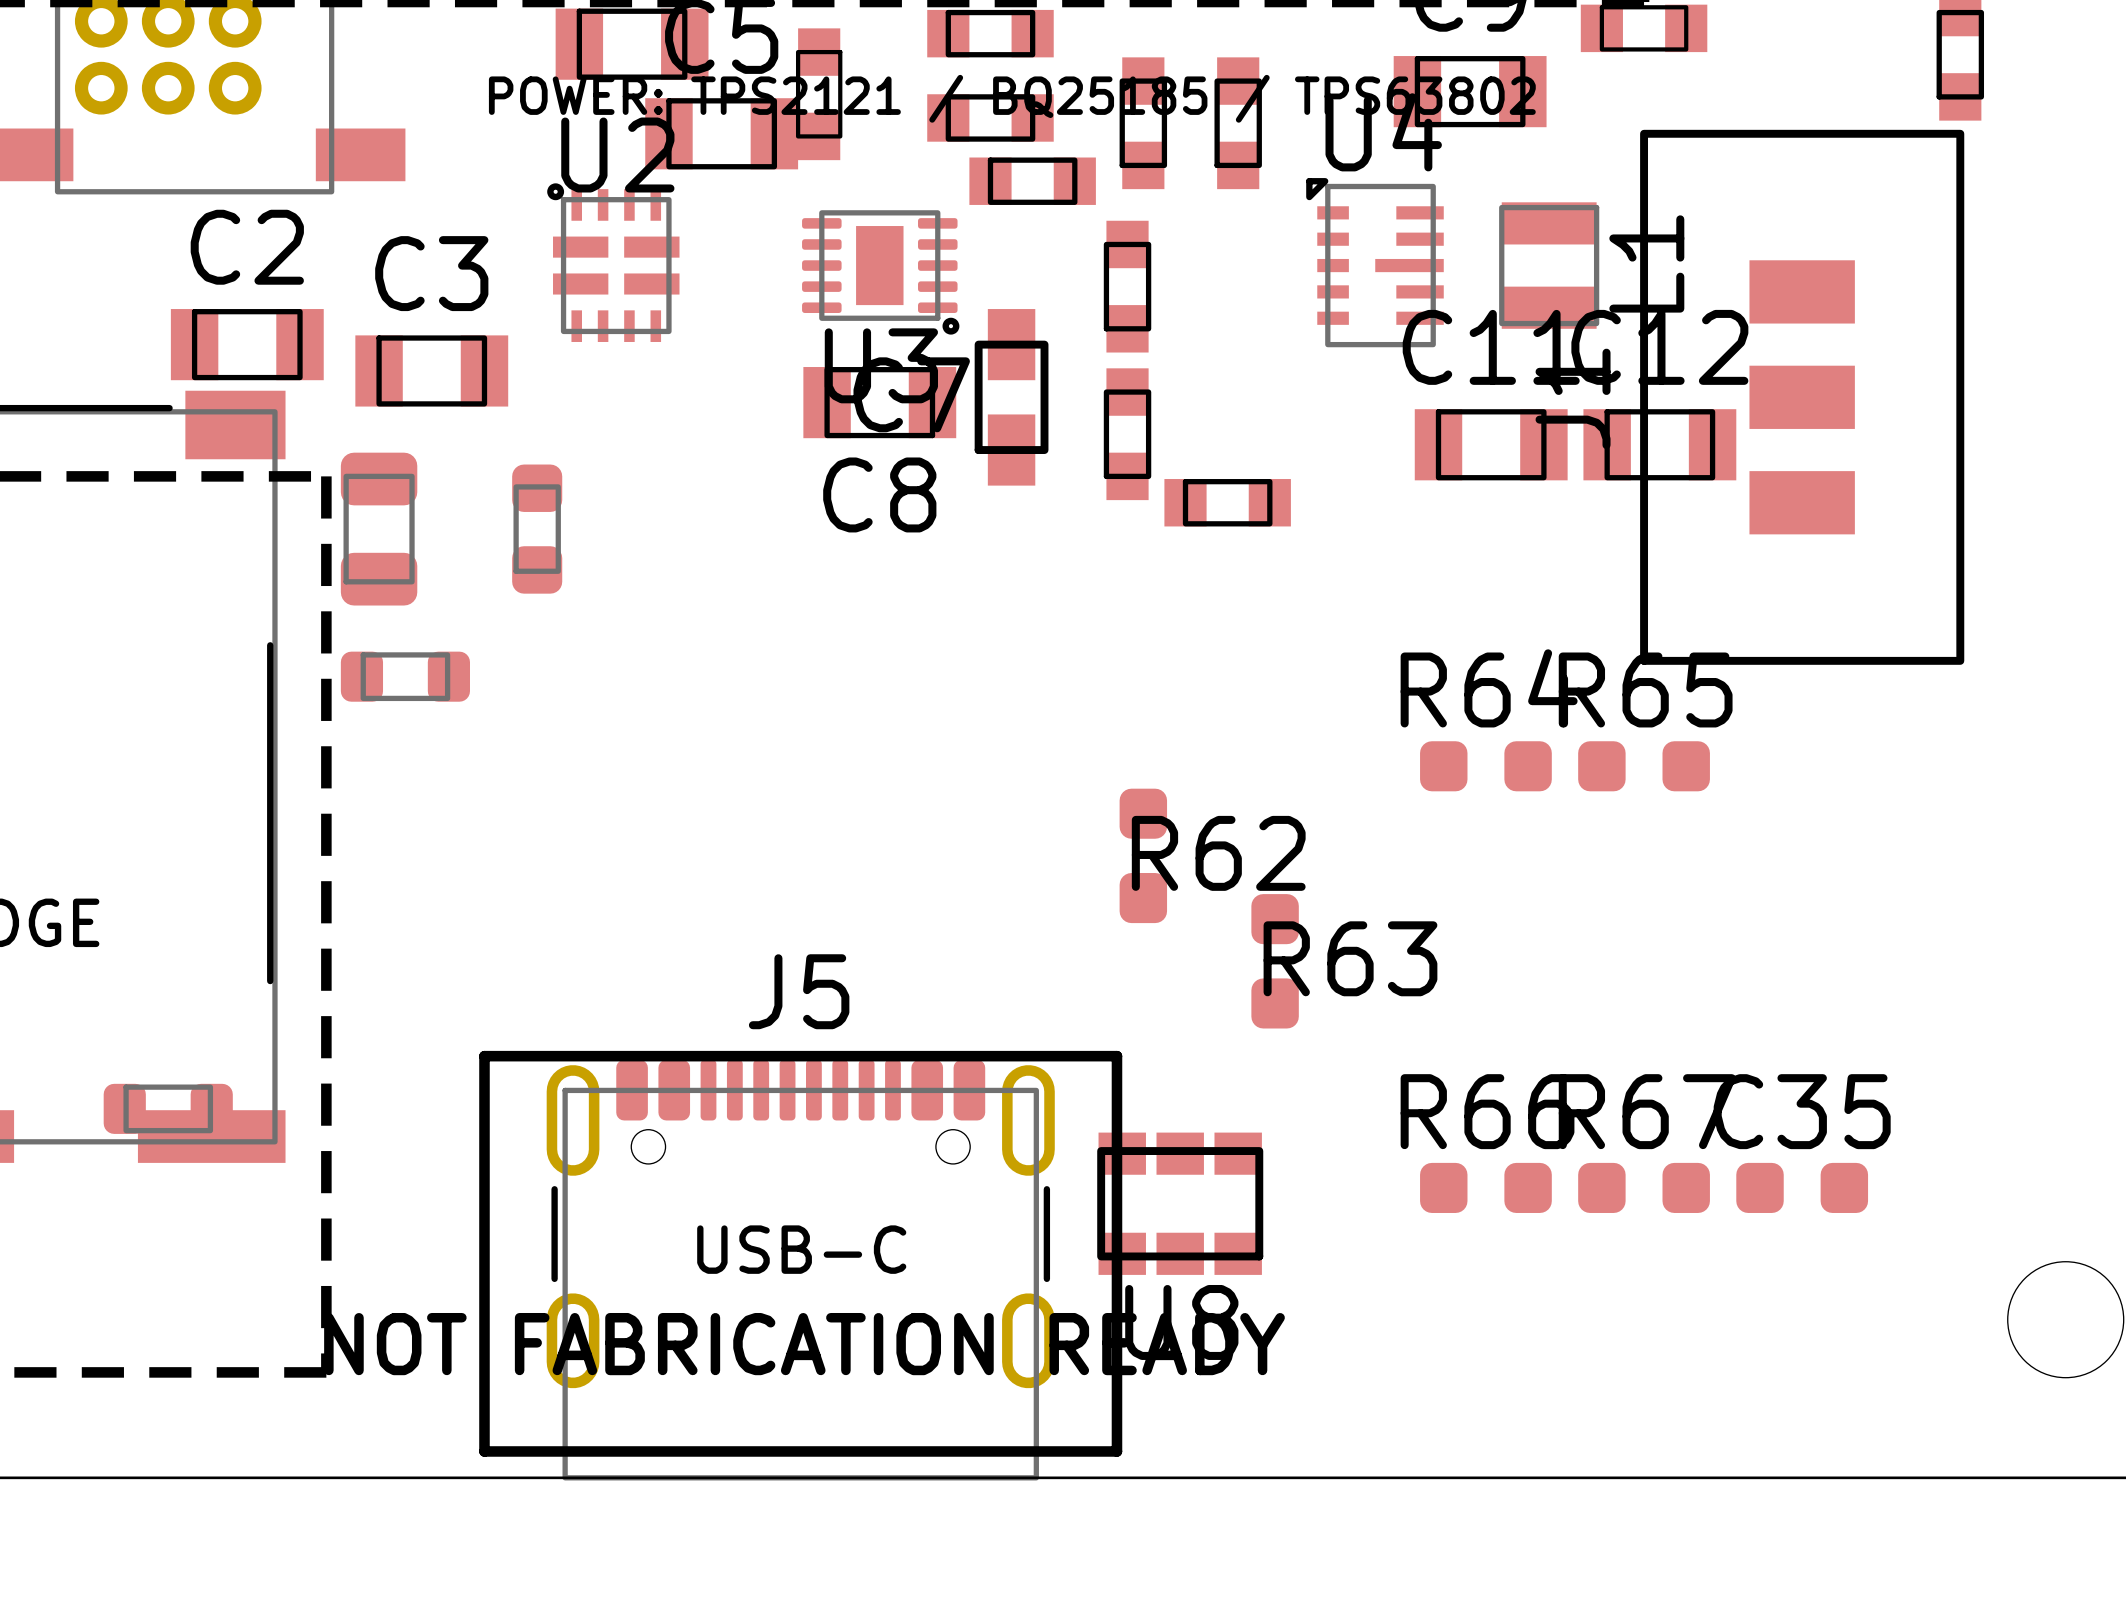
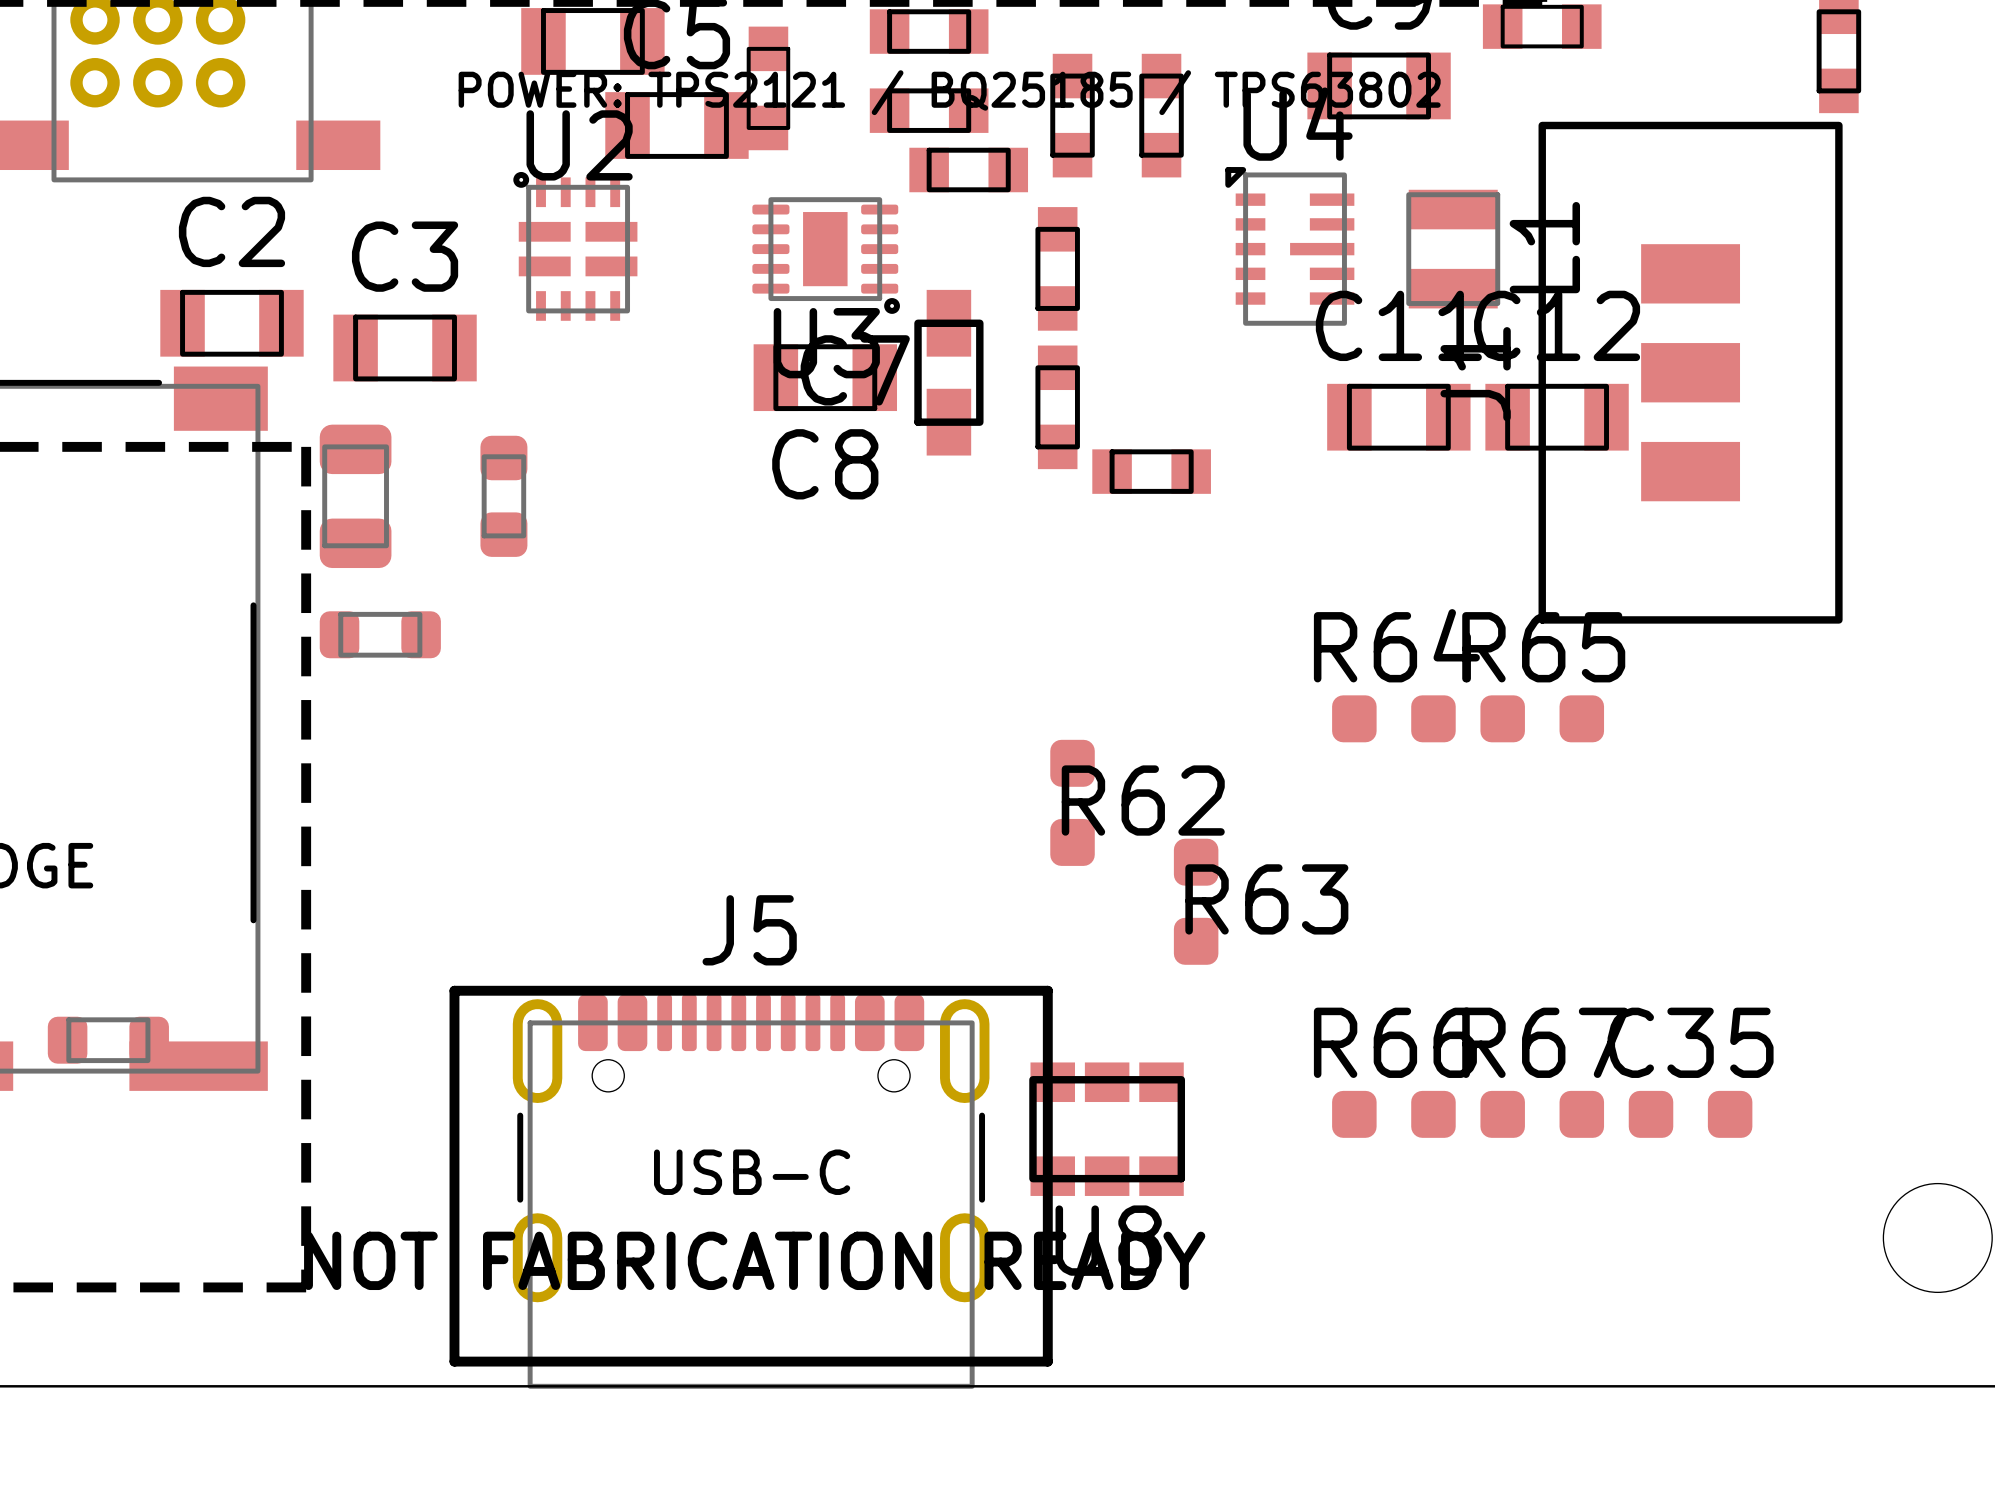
part position: (168, 1108) -> (108, 1040)

